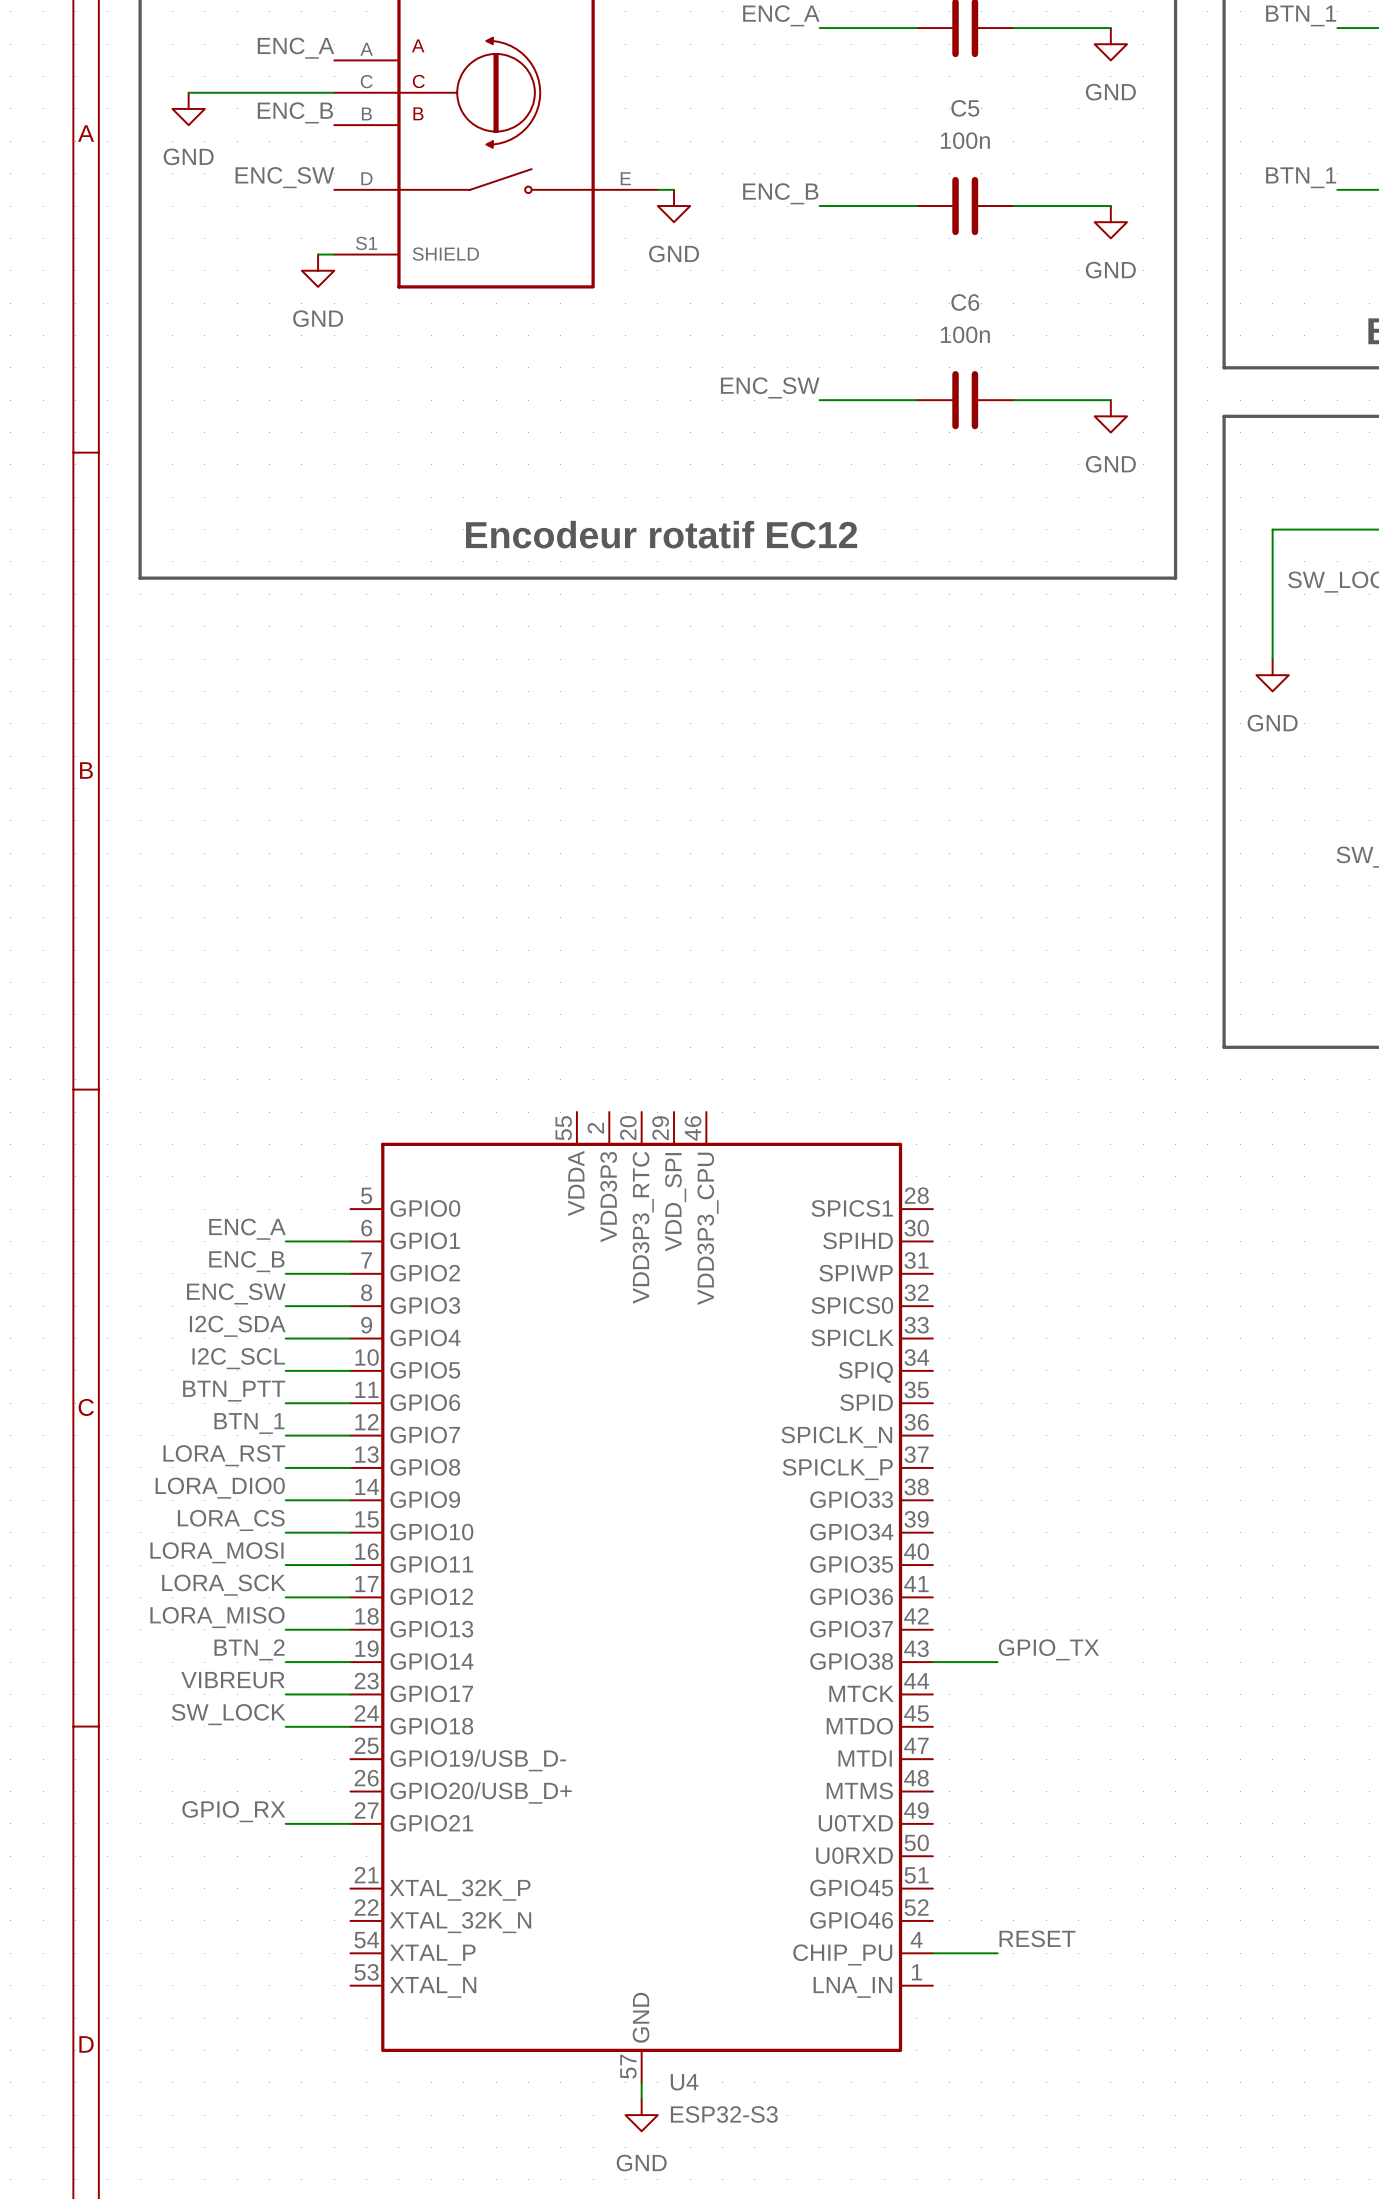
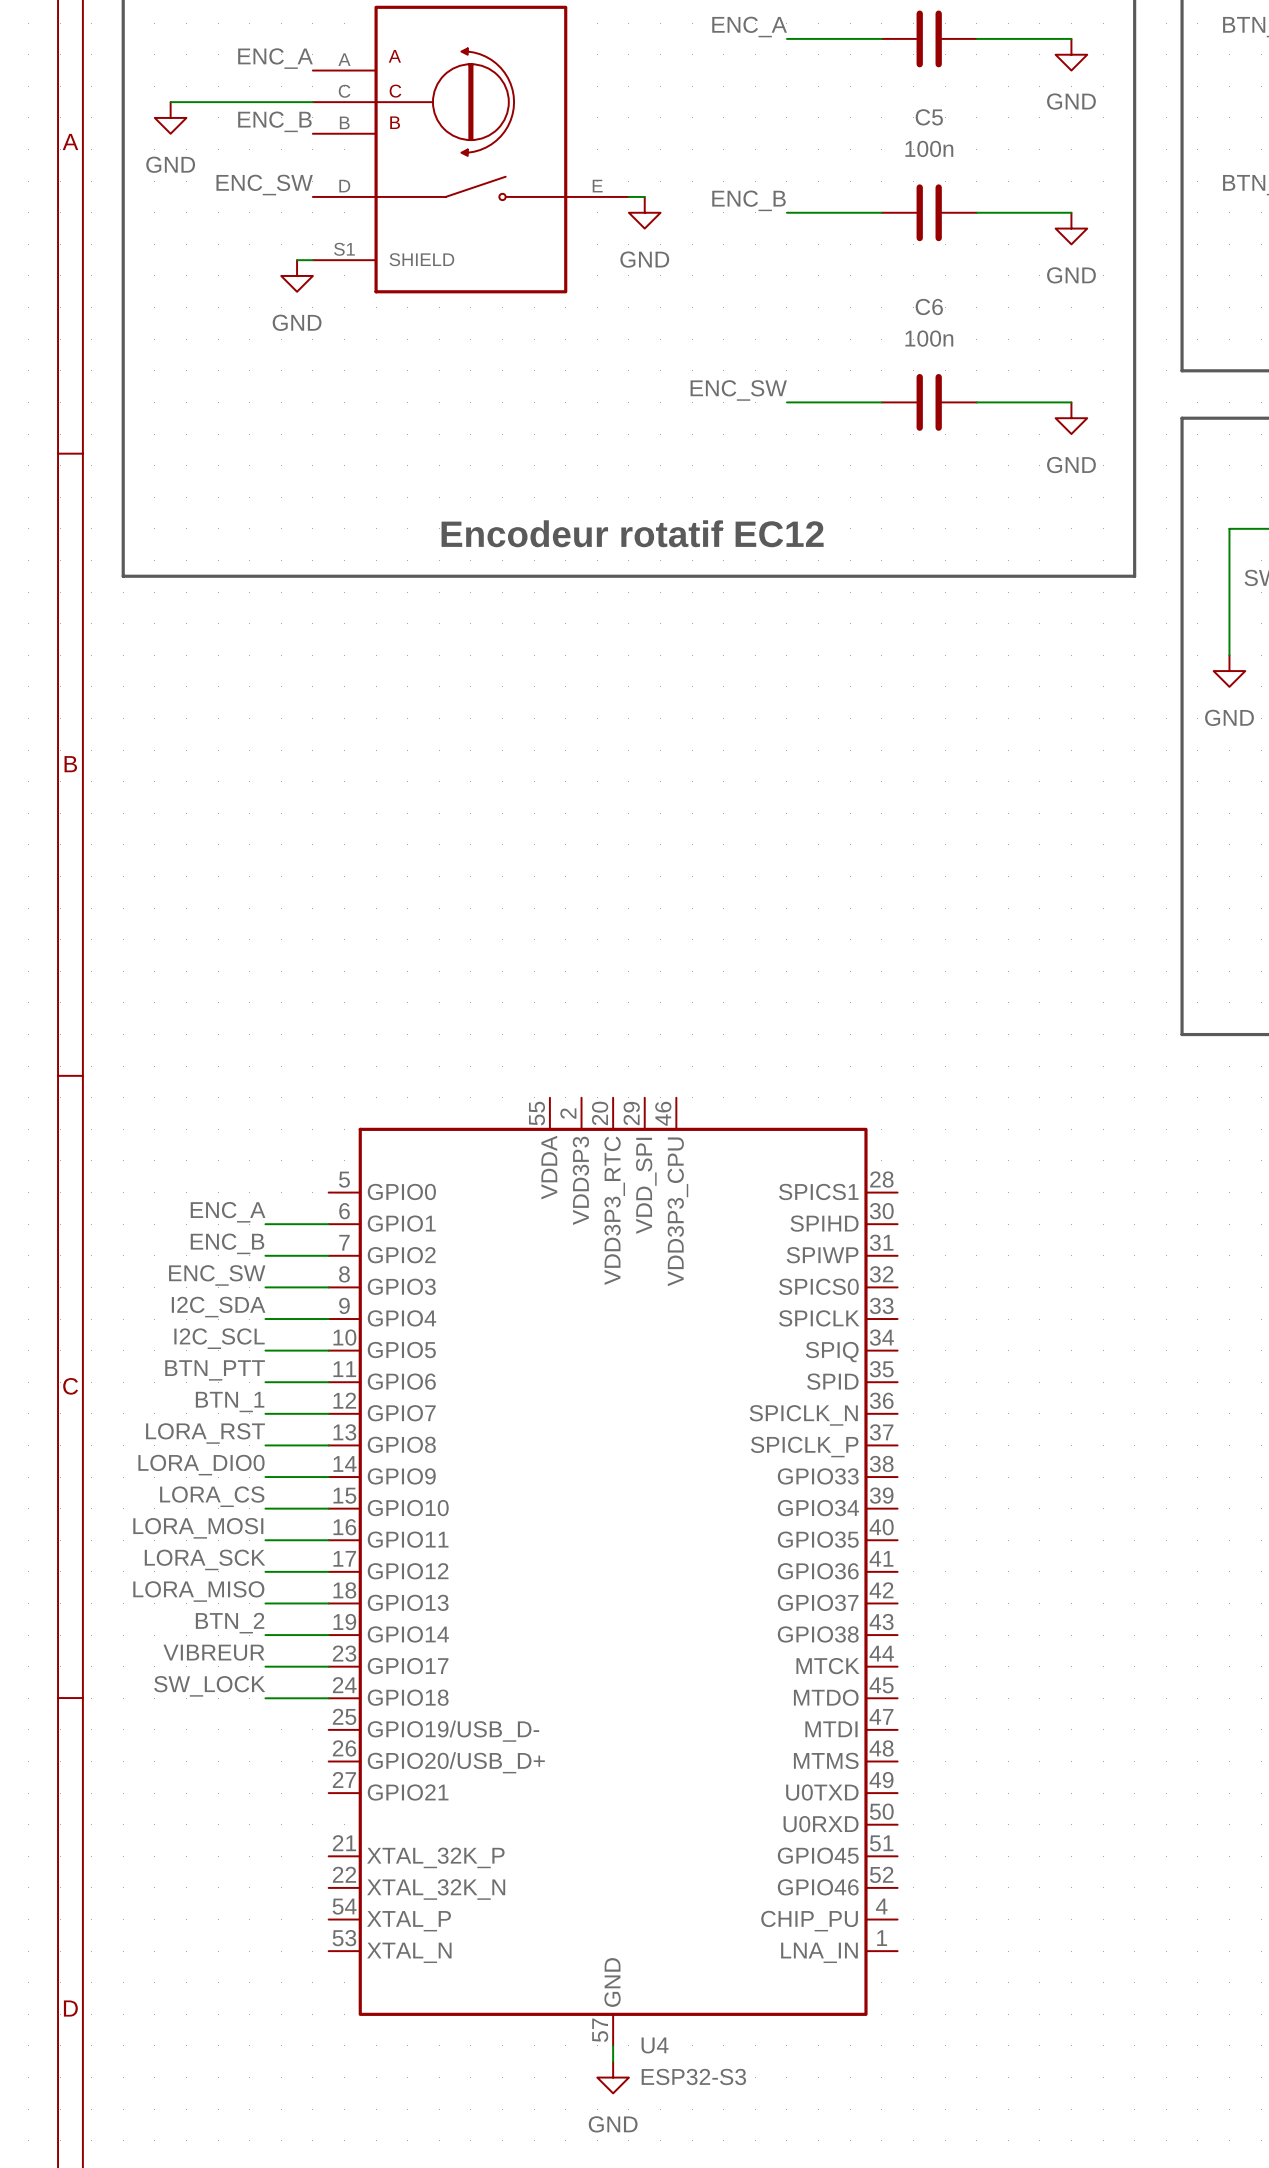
label: GPIO_TX (1048, 1649) -> none
wire: (932, 1662) (997, 1662) -> none
label: GPIO_RX (233, 1811) -> none
wire: (285, 1823) (350, 1823) -> none
label: RESET (1037, 1938) -> none
wire: (932, 1953) (997, 1953) -> none

